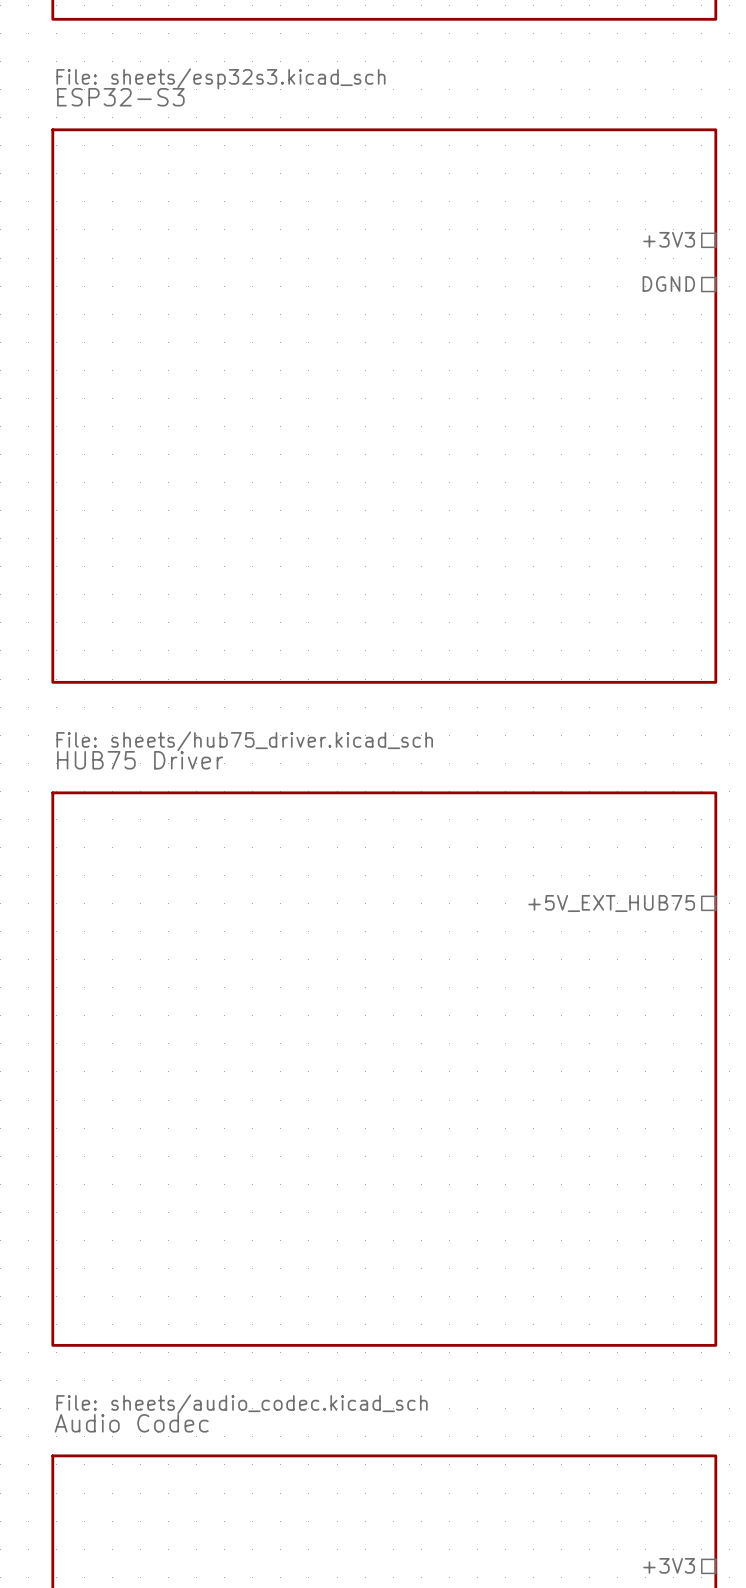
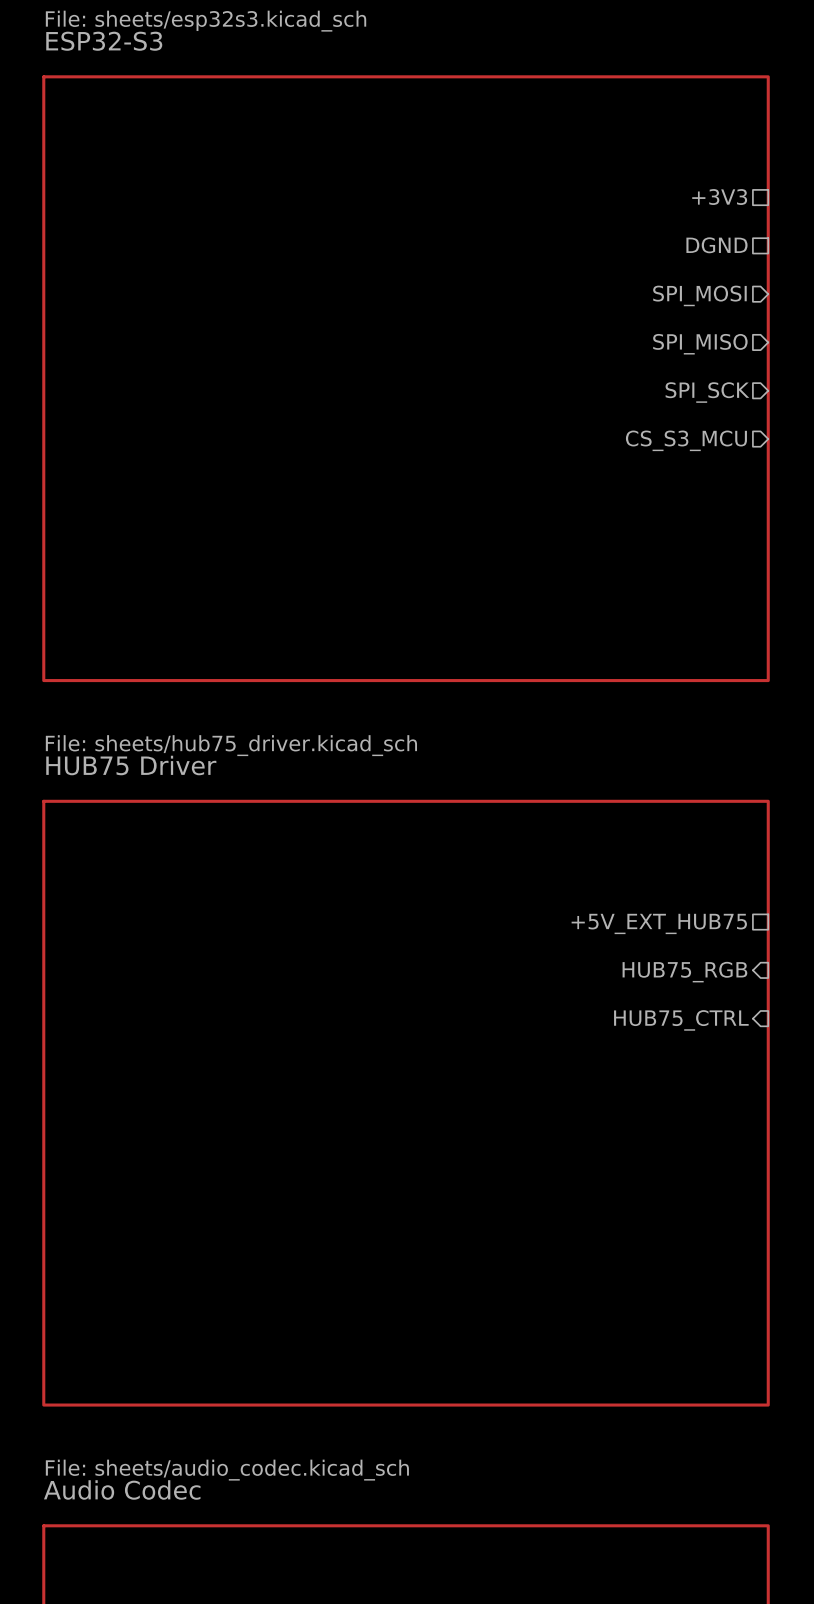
sheet pin: none -> SPI_MOSI (699, 295)
sheet pin: none -> SPI_MISO (700, 344)
sheet pin: none -> SPI_SCK (707, 392)
sheet pin: none -> CS_S3_MCU (686, 440)
sheet pin: none -> HUB75_RGB (684, 972)
sheet pin: none -> HUB75_CTRL (681, 1020)

